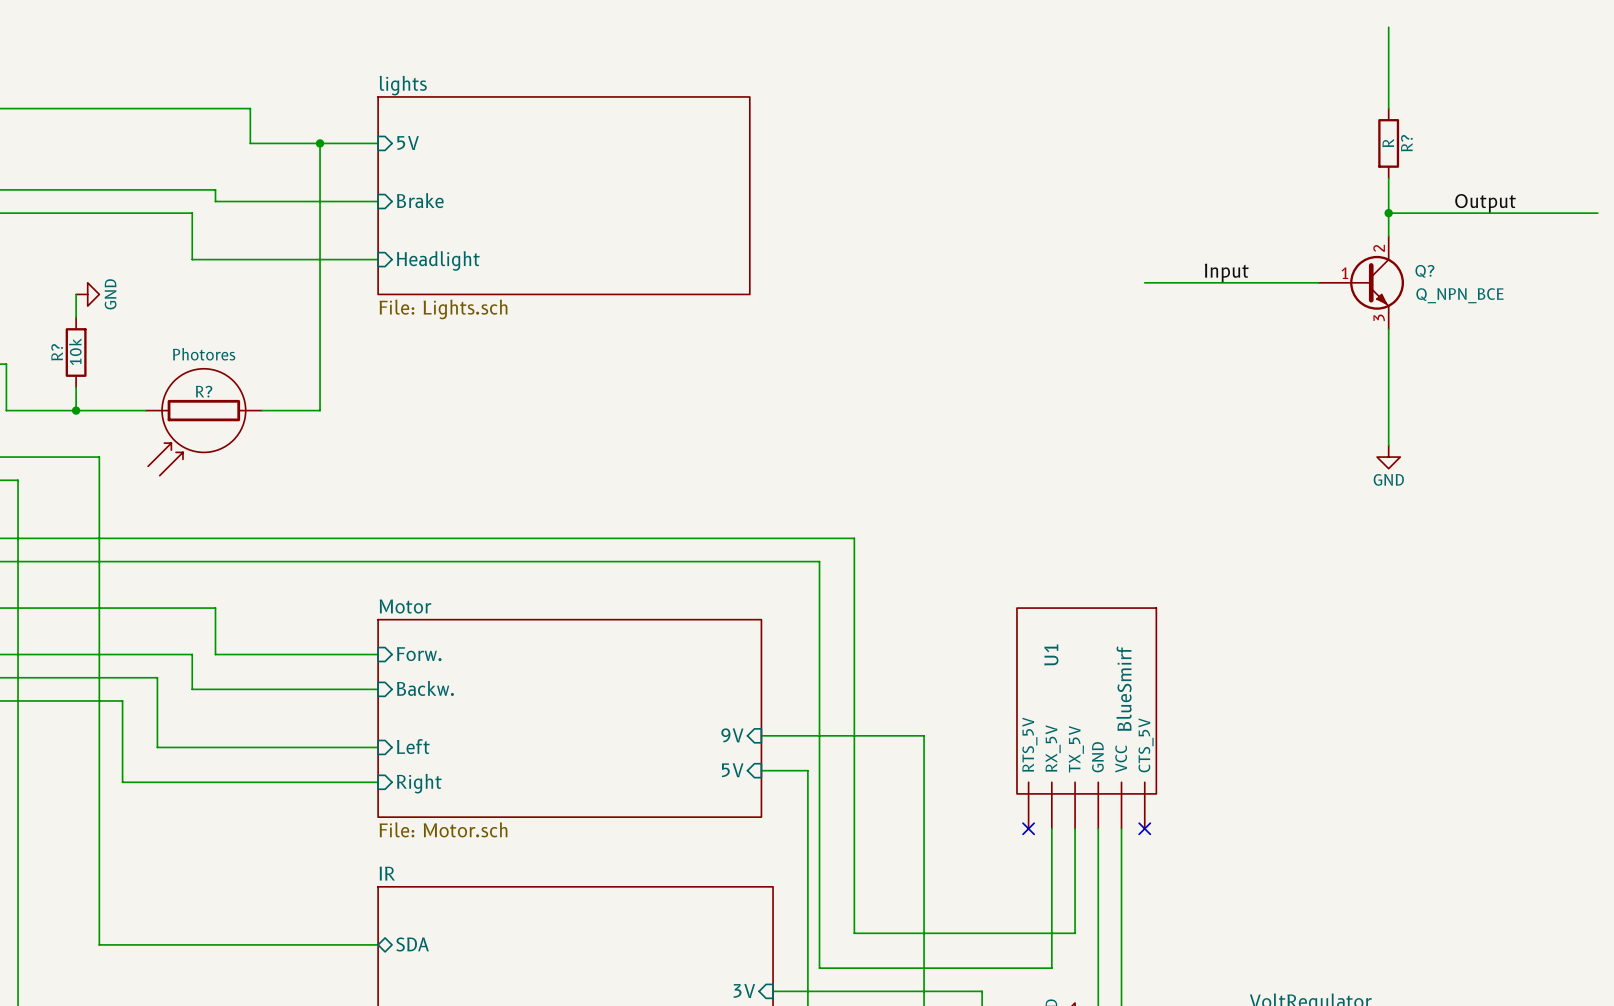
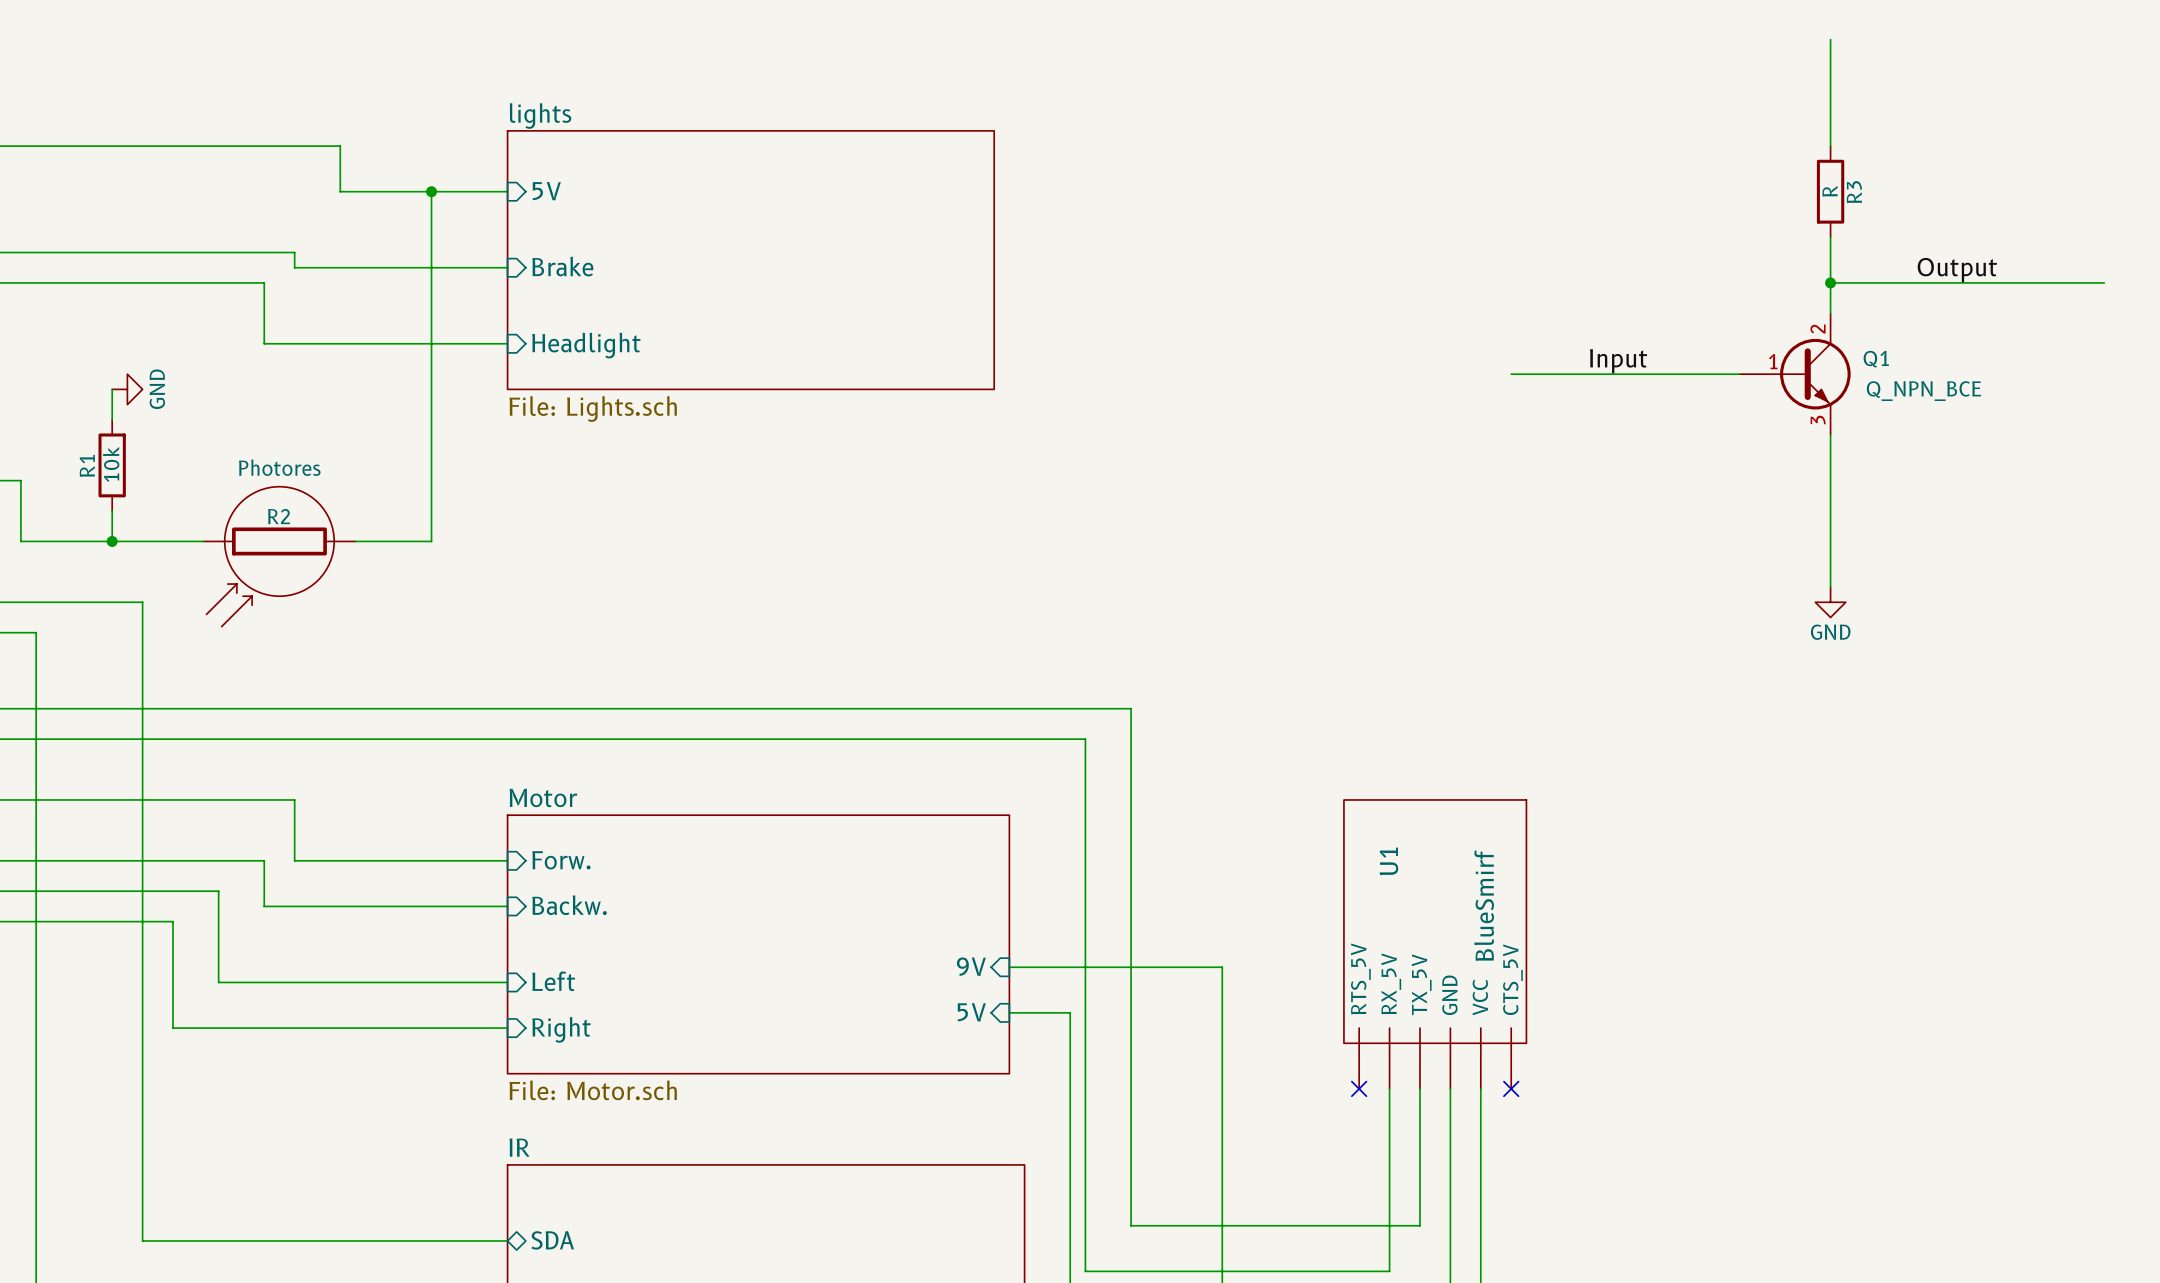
R? name: R? (1406, 143) -> R3 (1854, 192)
Q? name: Q? (1424, 271) -> Q1 (1876, 359)
R? name: R? (57, 352) -> R1 (87, 465)
R? name: R? (204, 391) -> R2 (279, 516)

